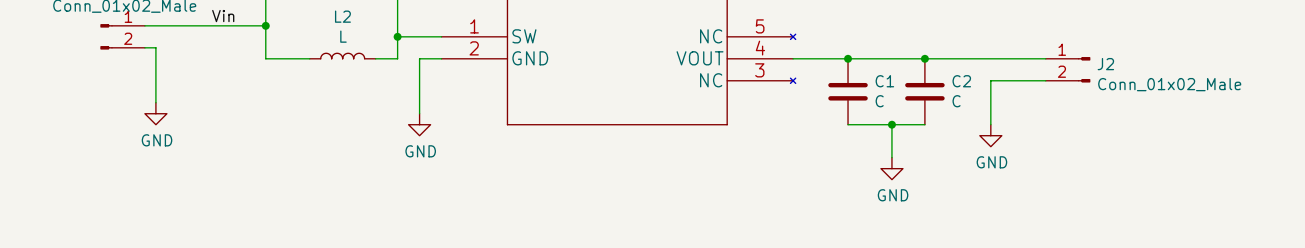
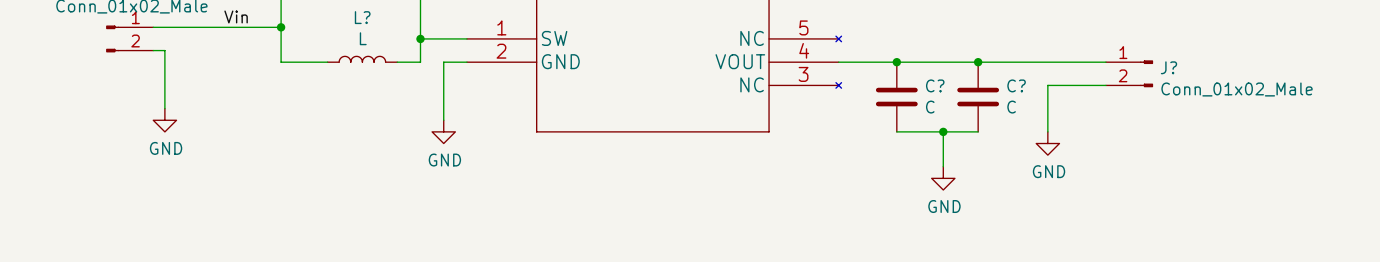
L2 name: L2 (342, 16) -> L? (362, 17)
J2 name: J2 (1105, 64) -> J? (1168, 67)
C1 name: C1 (884, 81) -> C? (935, 85)
C2 name: C2 (961, 81) -> C? (1016, 85)

